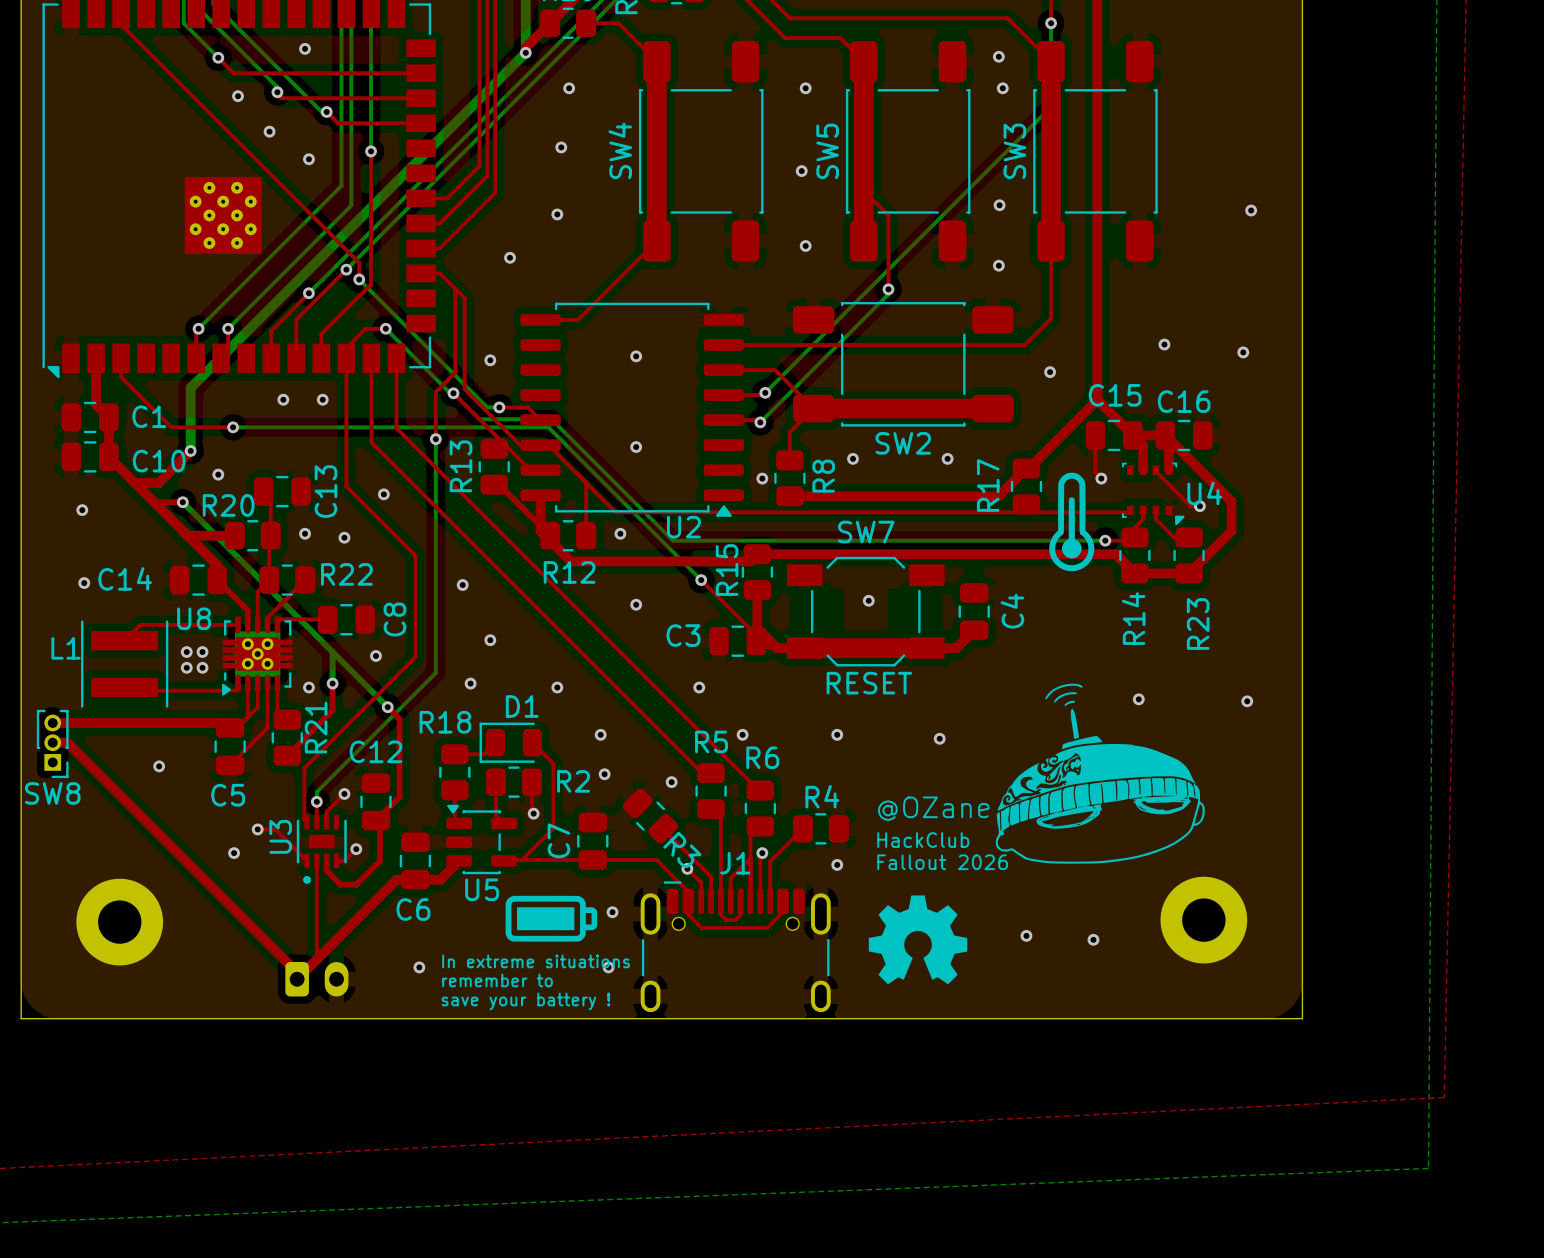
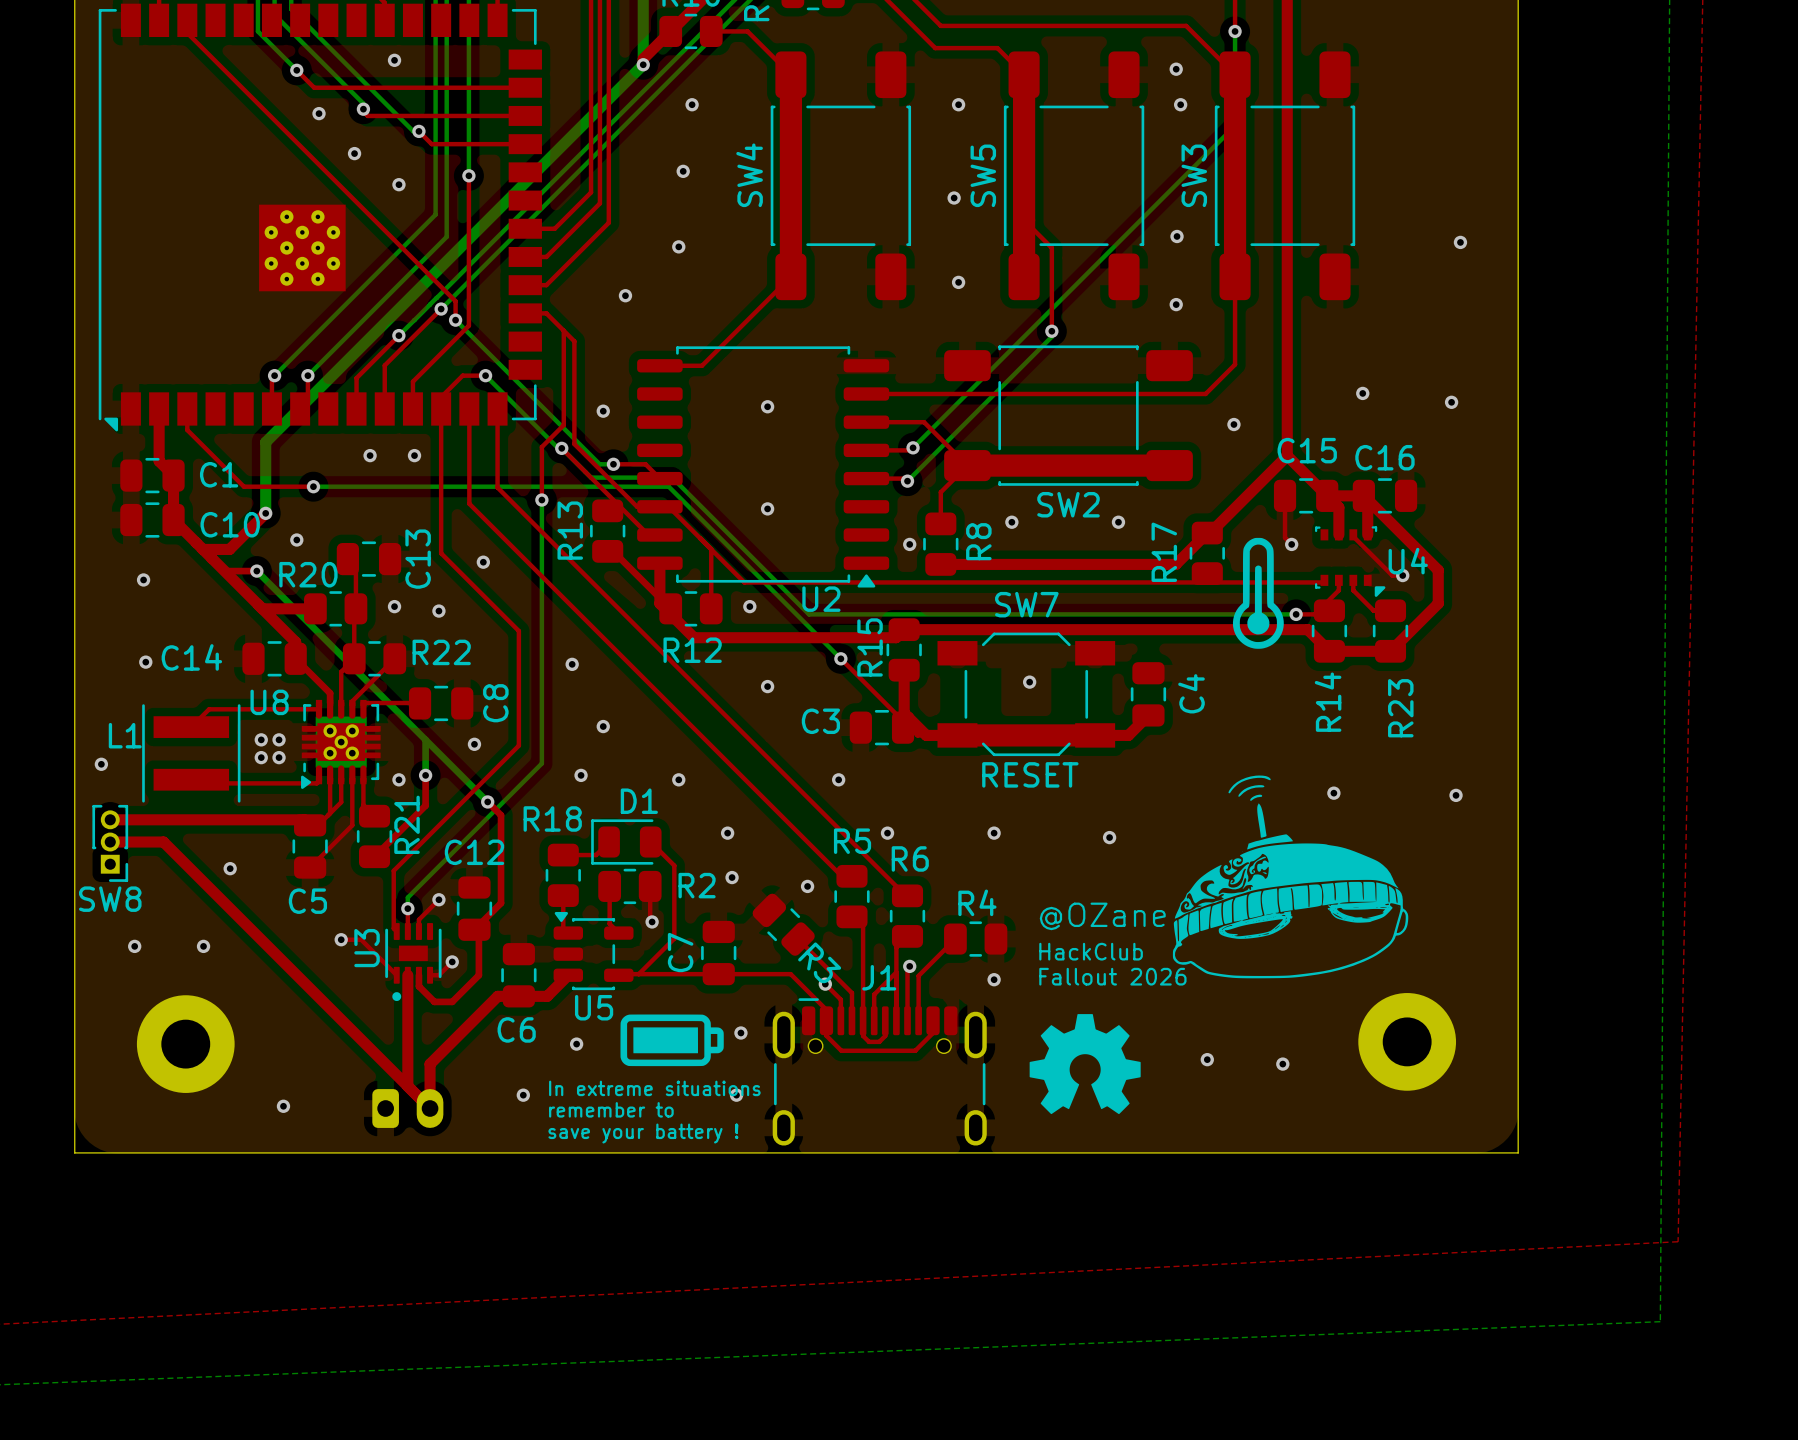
via: none -> (101, 764)
top track: (67, 742) (297, 972) -> (126, 842) (163, 842) (430, 1108) (430, 1064)
via: none -> (134, 946)
via: none -> (203, 946)
via: (234, 853) -> none
top track width: thin (316, 860) (316, 959) -> thick (407, 975) (407, 1086)
via: none -> (576, 1044)
top track: (336, 939) (297, 979) (316, 959) -> none
via: none -> (283, 1106)

